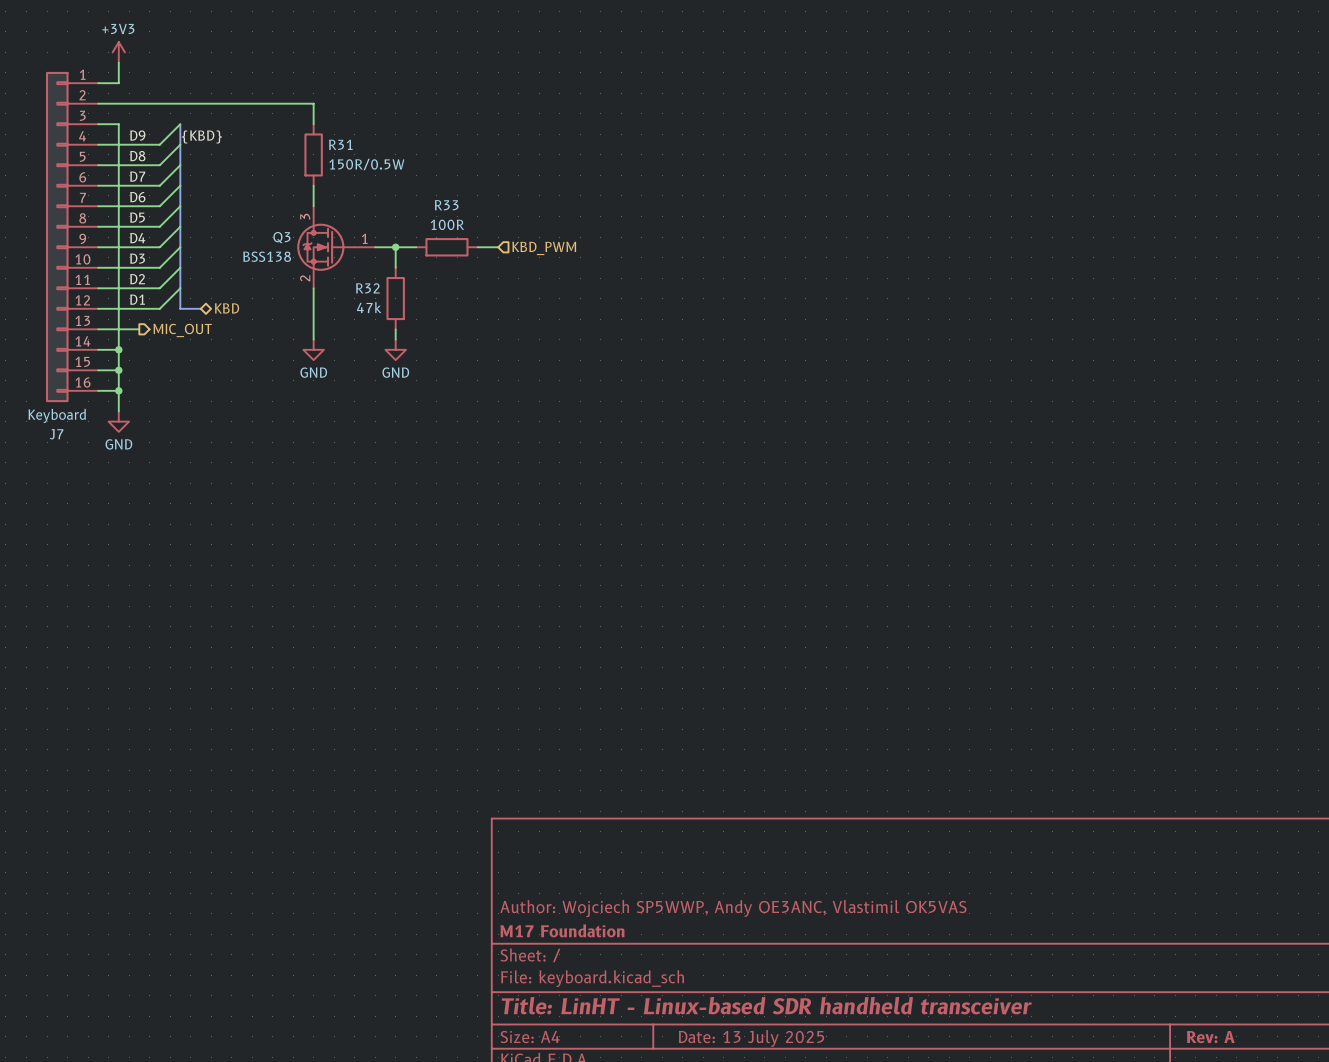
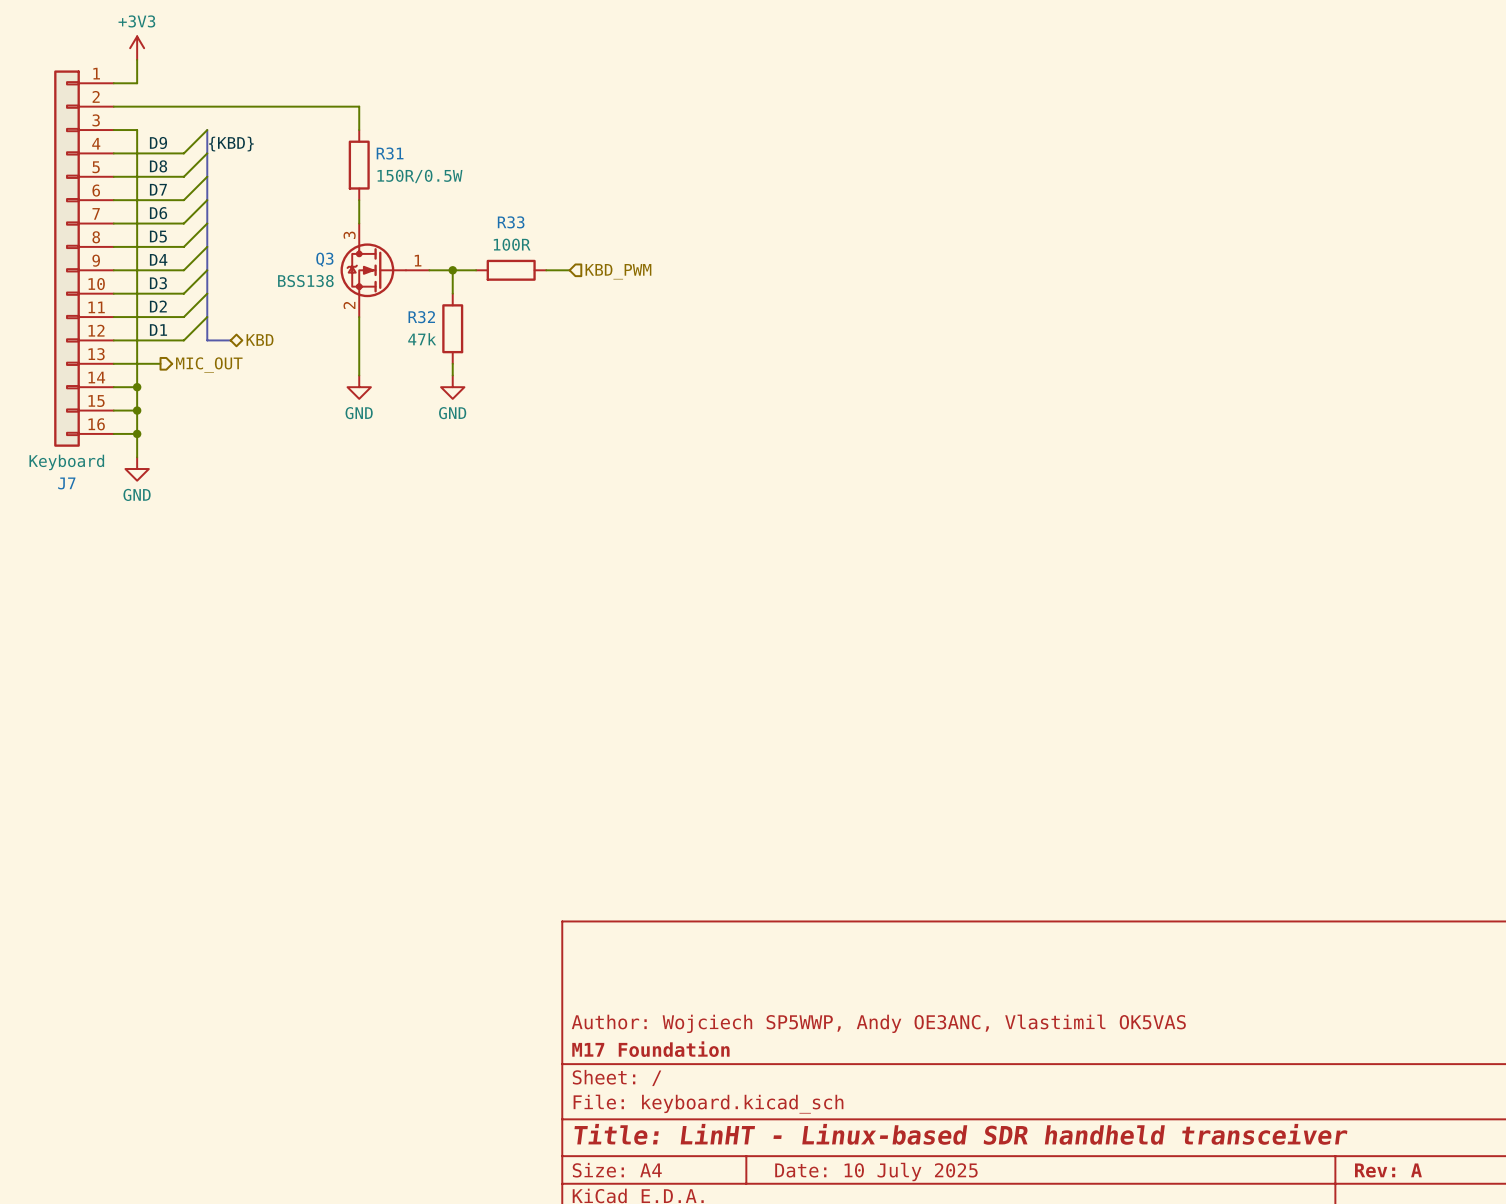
title block: Date: 13 July 2025 (751, 1038) -> Date: 10 July 2025 (876, 1171)

